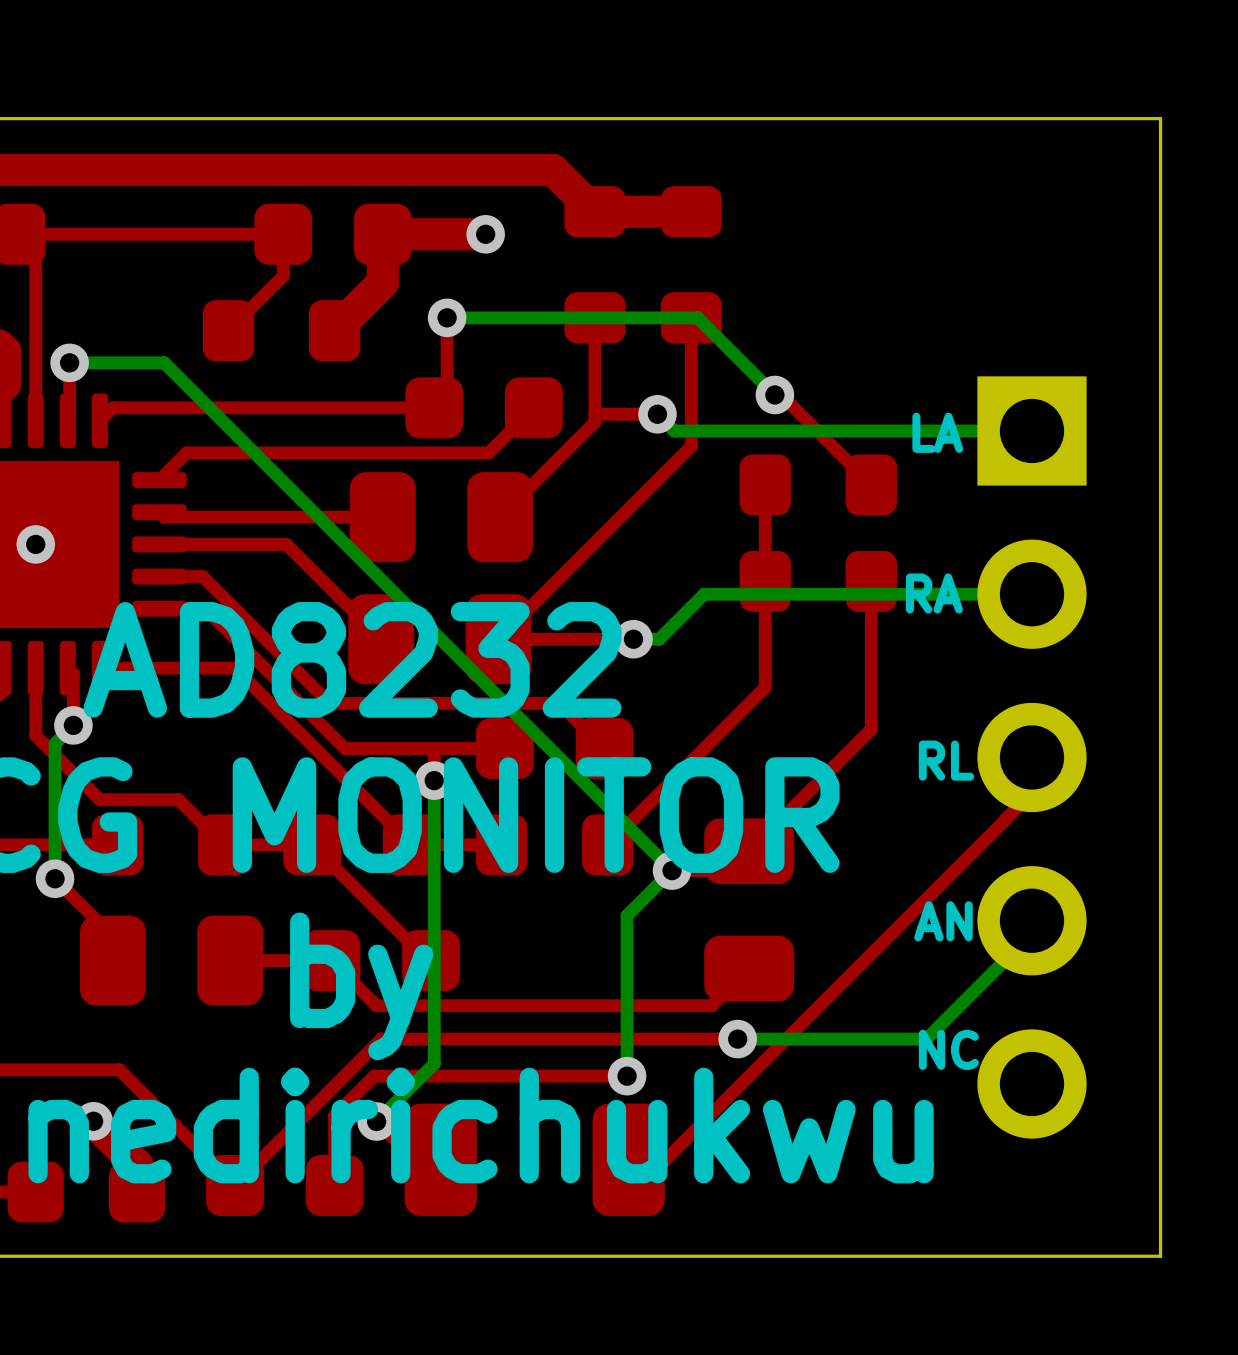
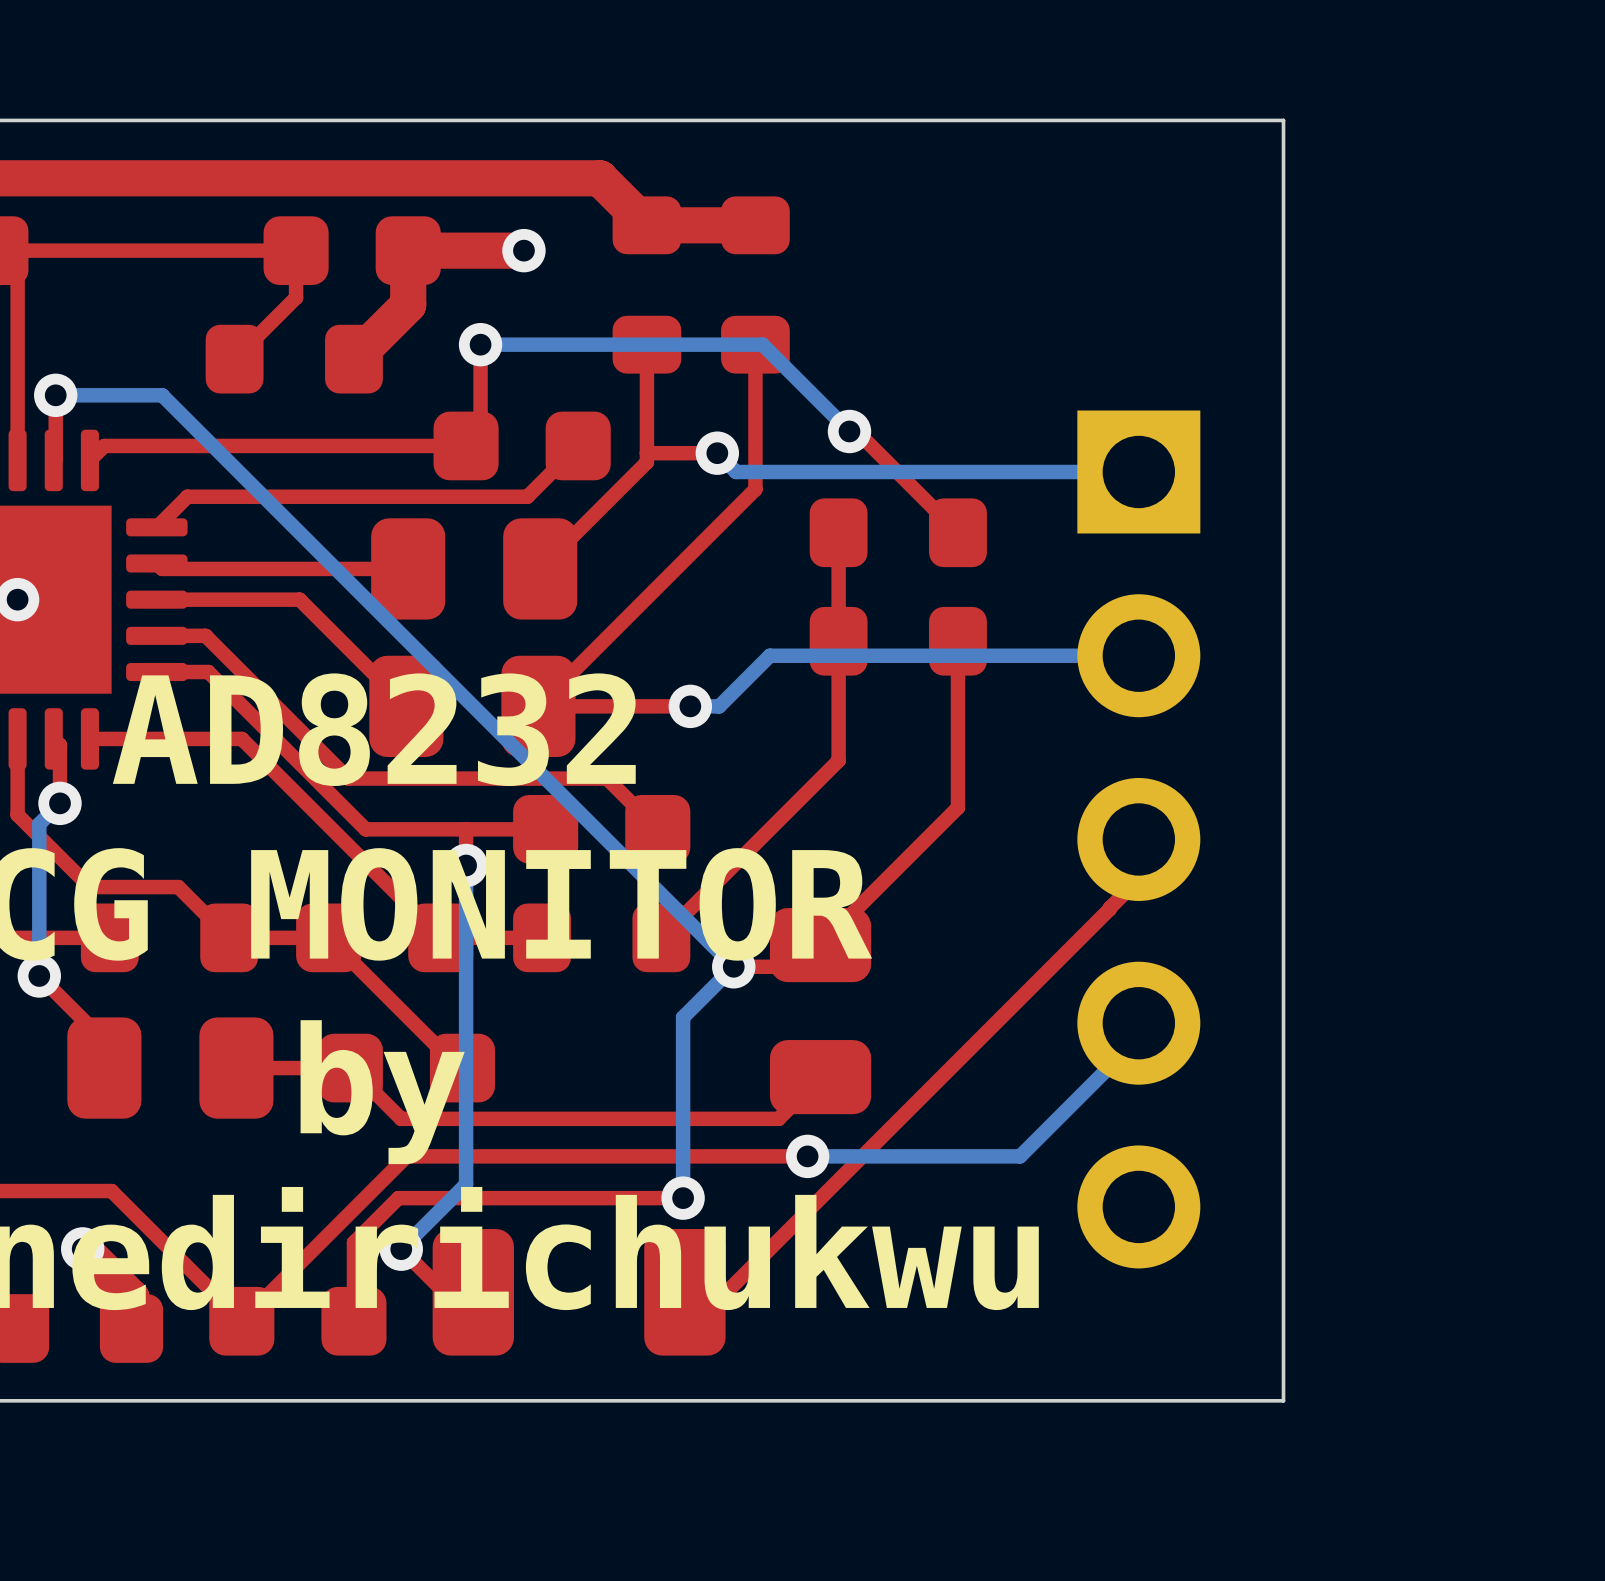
text: LA (937, 432) -> none
text: RA (934, 593) -> none
text: RL (946, 760) -> none
text: AN (943, 921) -> none
text: NC (948, 1049) -> none

